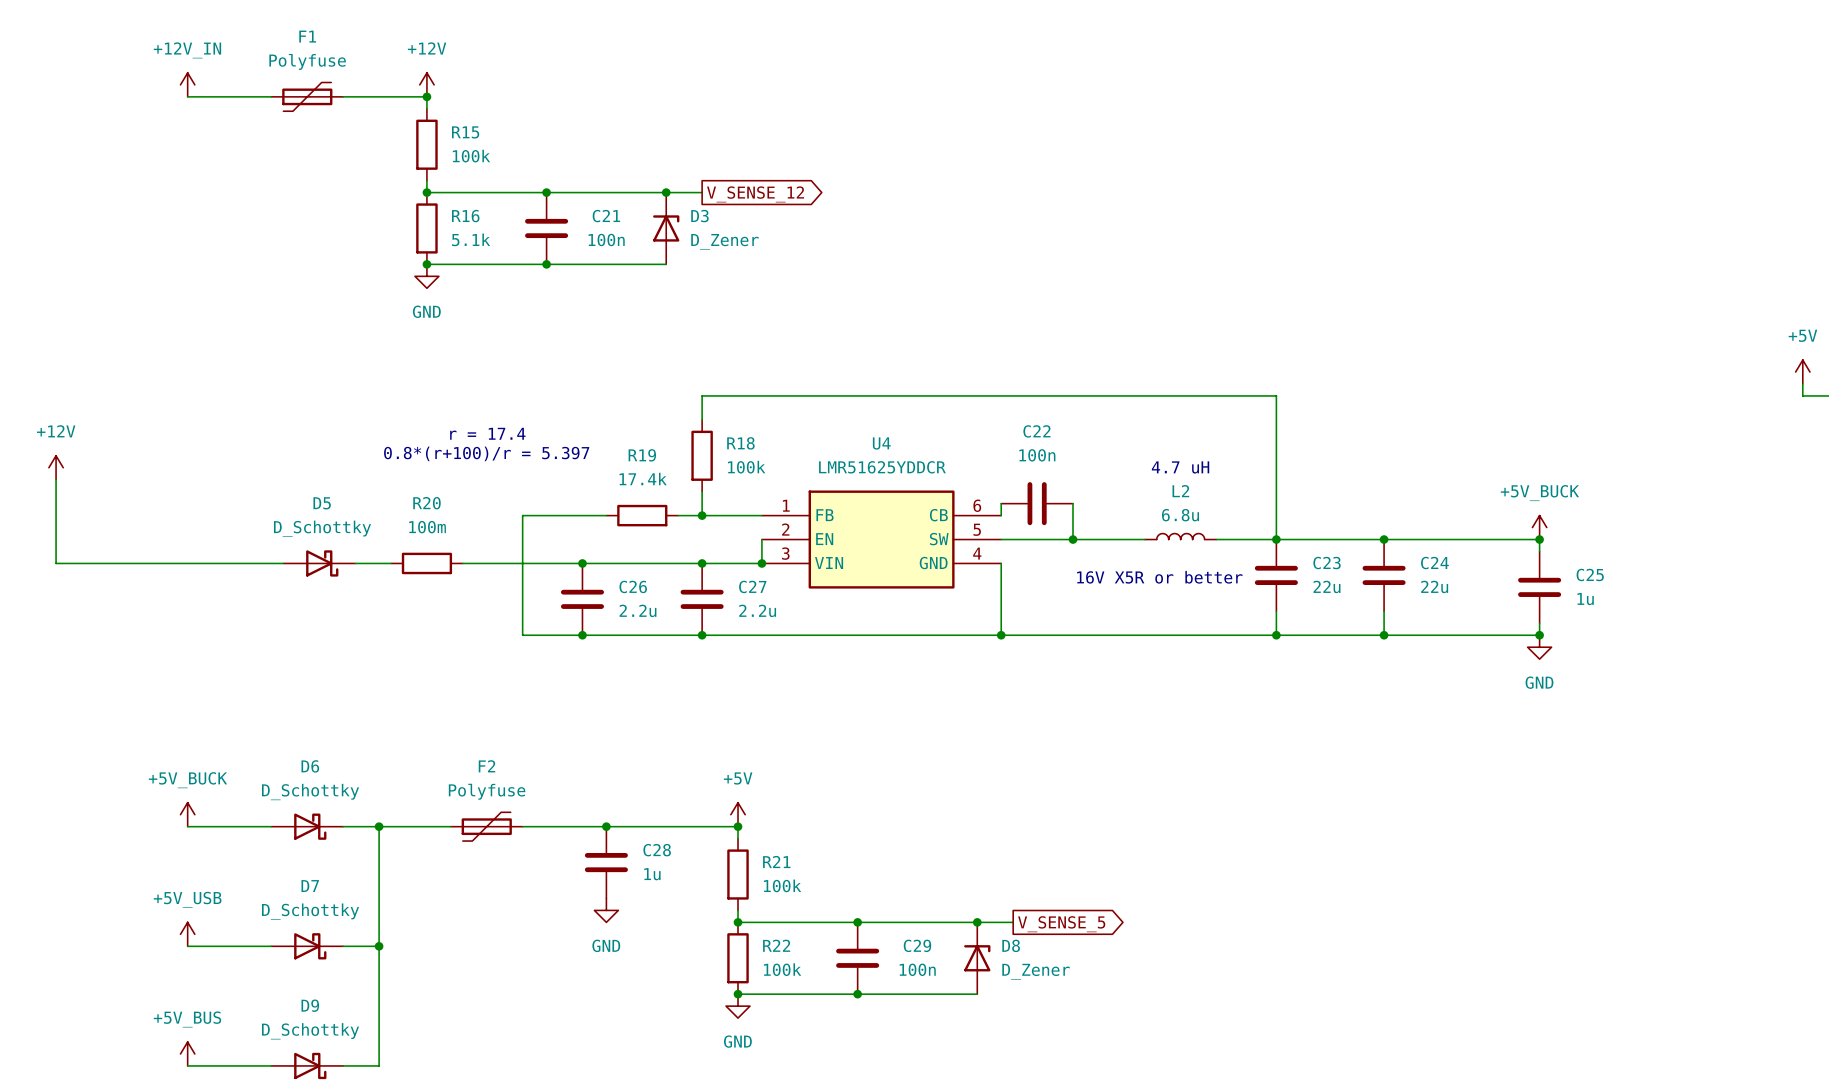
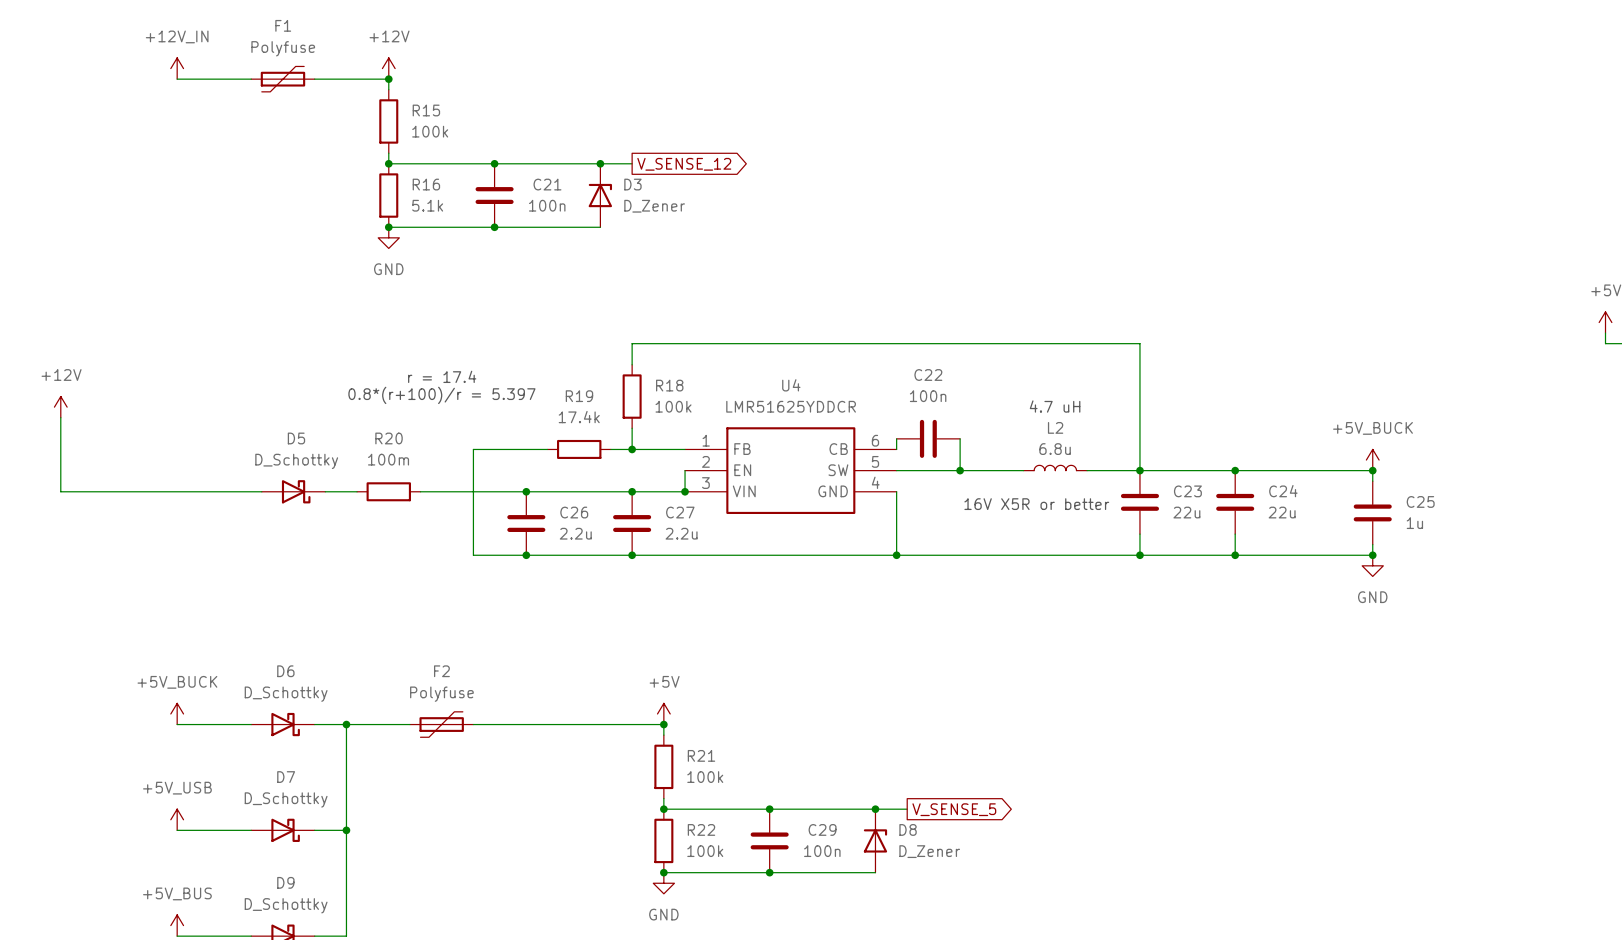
junction: (606, 826) -> none
C28: 1u (606, 862) -> none
power symbol: GND (606, 910) -> none

